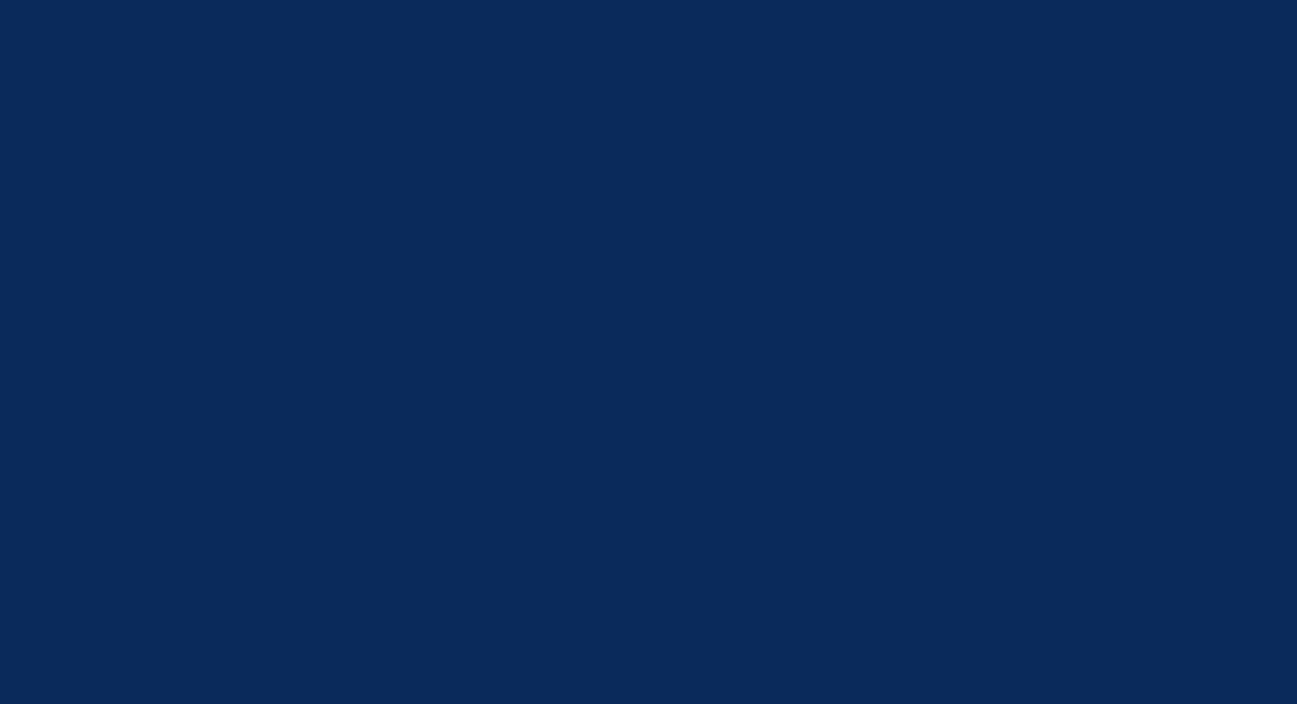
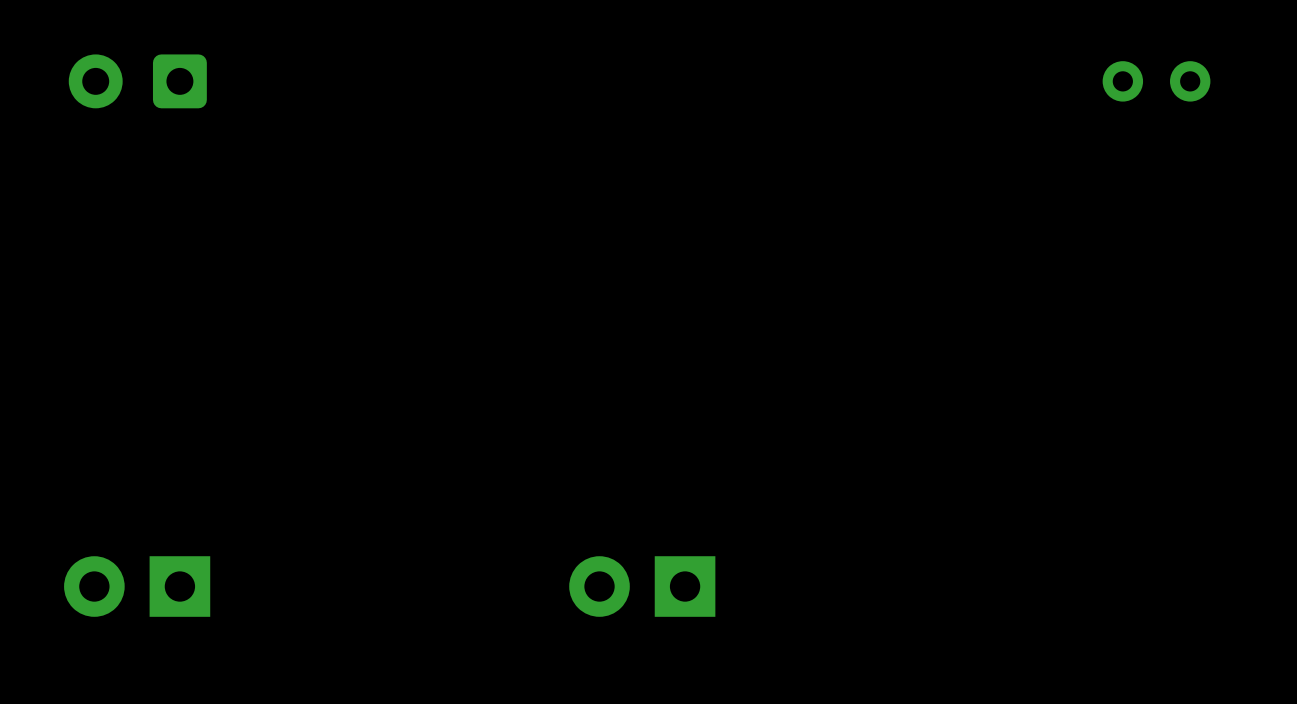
part: none -> (137, 81)
part: none -> (1156, 81)
part: none -> (137, 586)
part: none -> (642, 586)

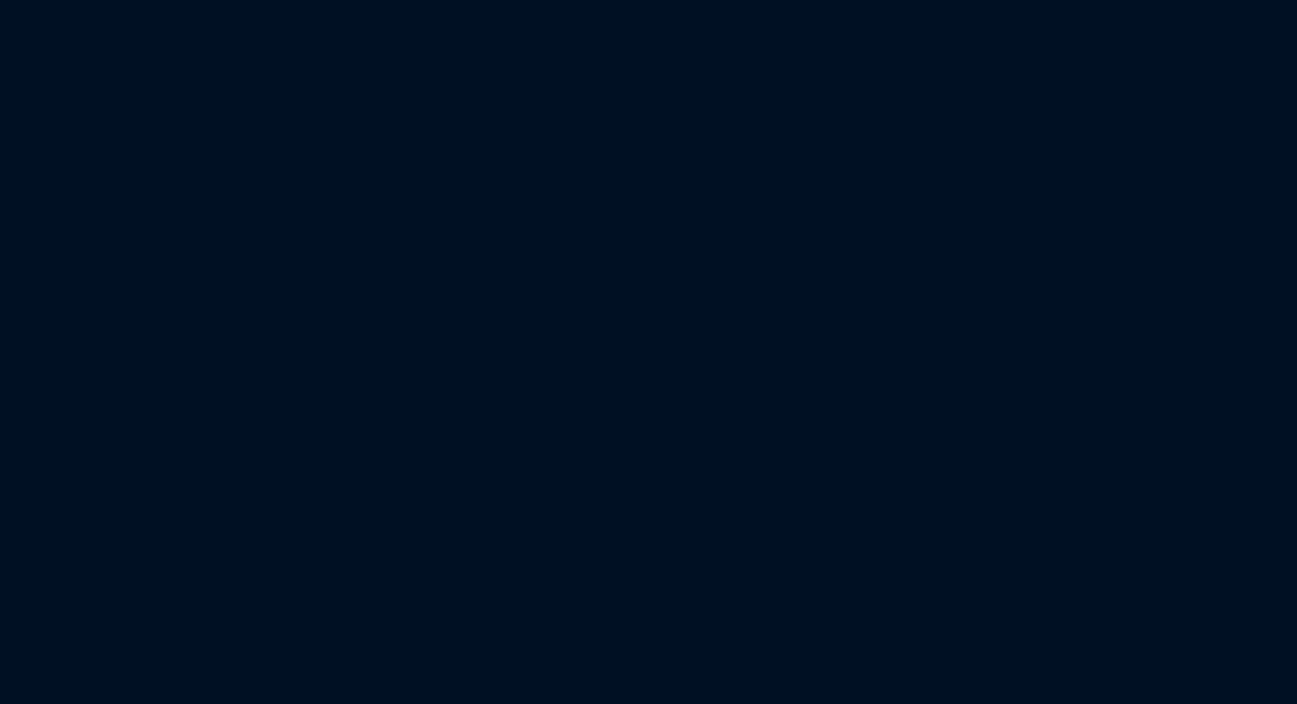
part: (137, 81) -> none
part: (1156, 81) -> none
part: (137, 586) -> none
part: (642, 586) -> none

